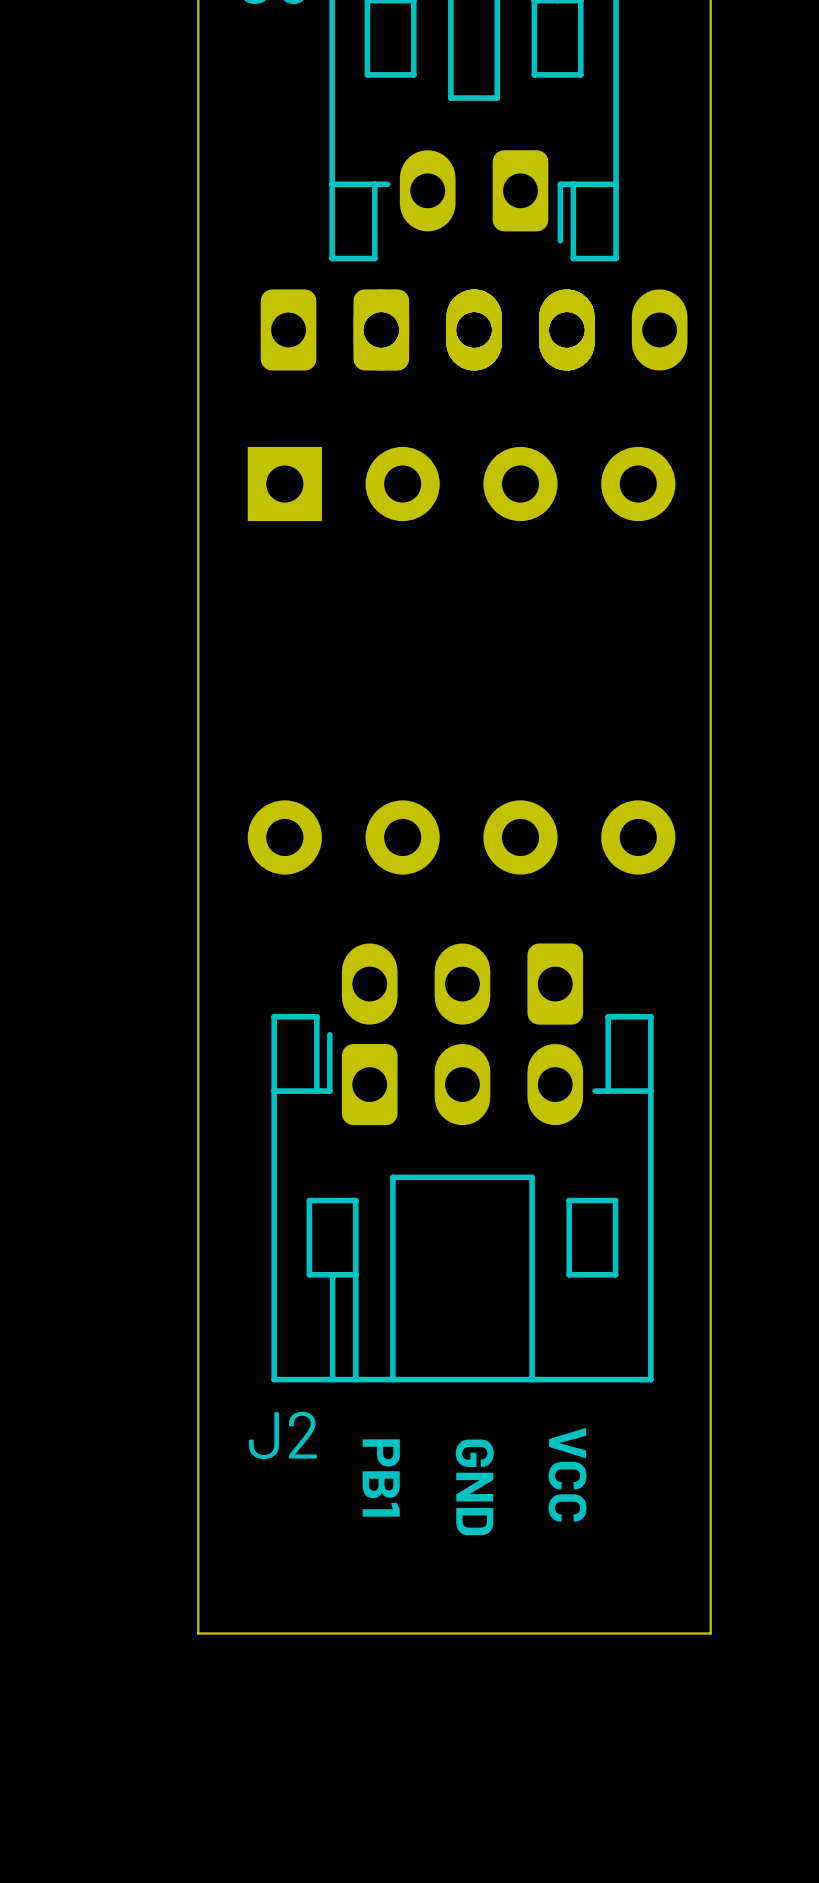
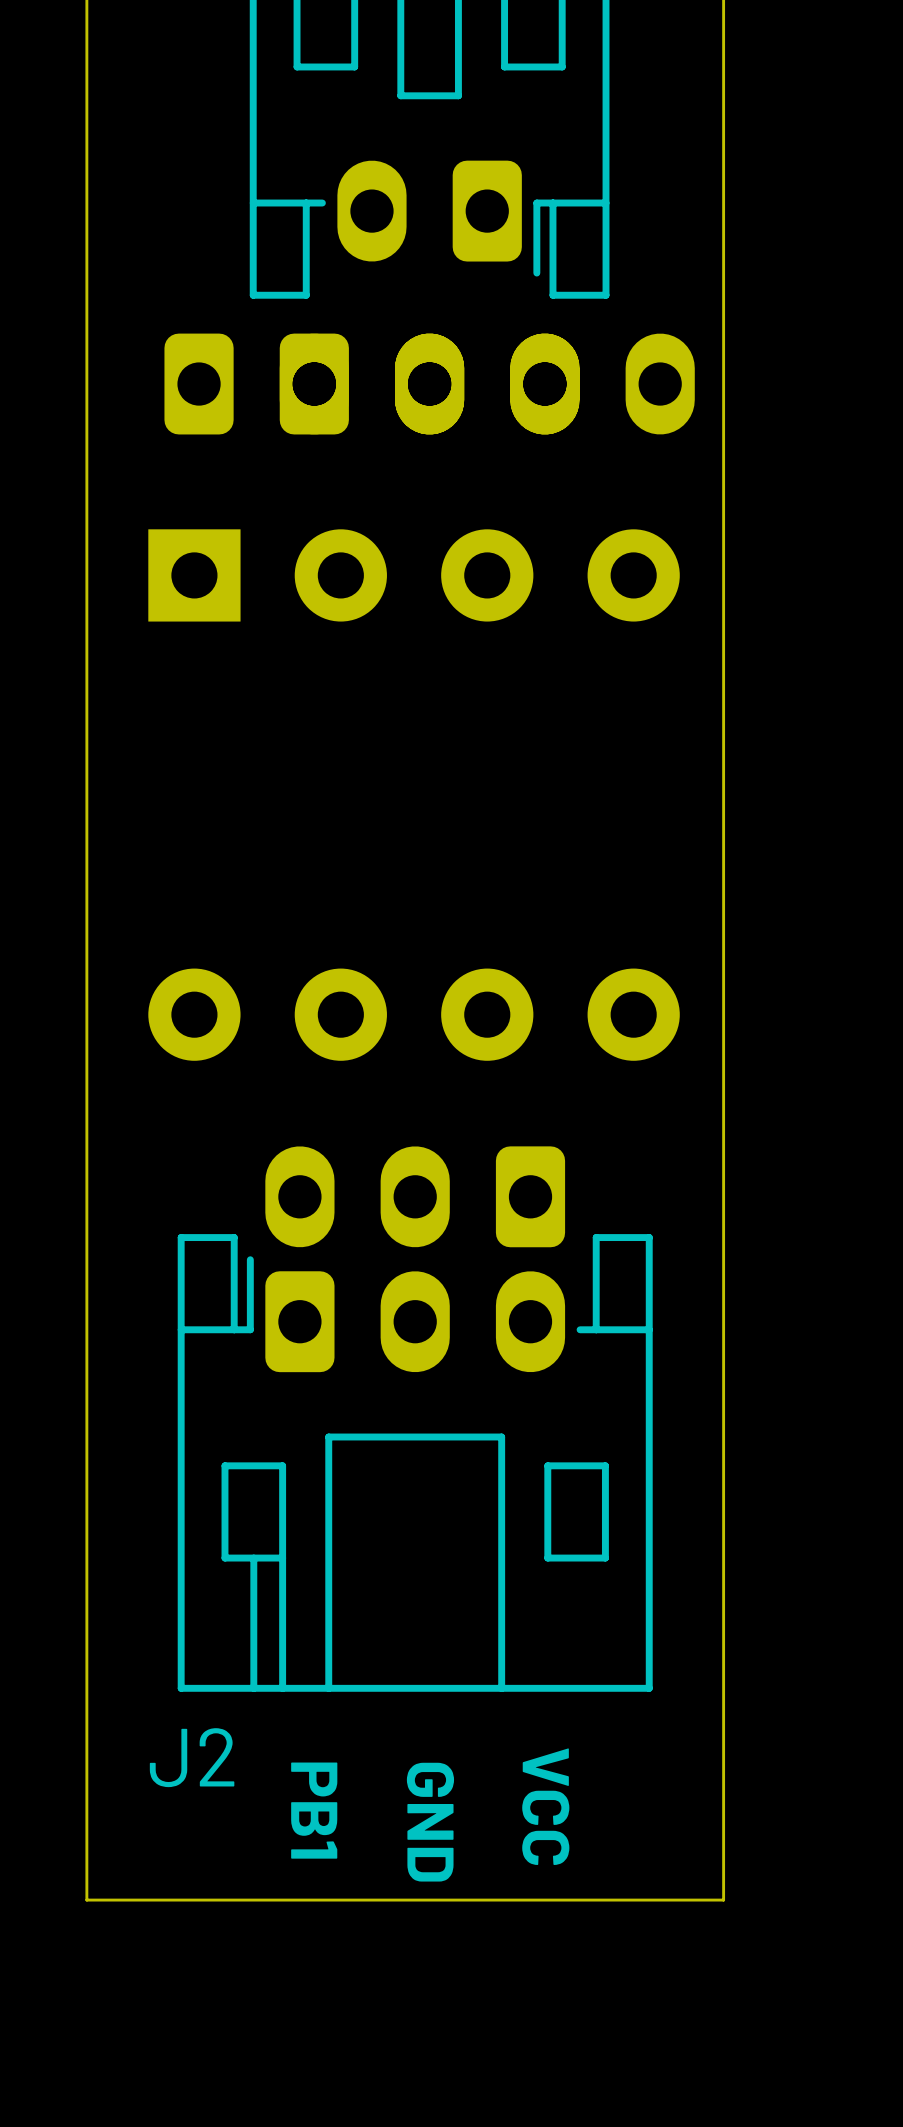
board edge: (710, 1550) (710, 1633) (198, 1633) (198, 1550) -> (723, 1900) (86, 1900)

